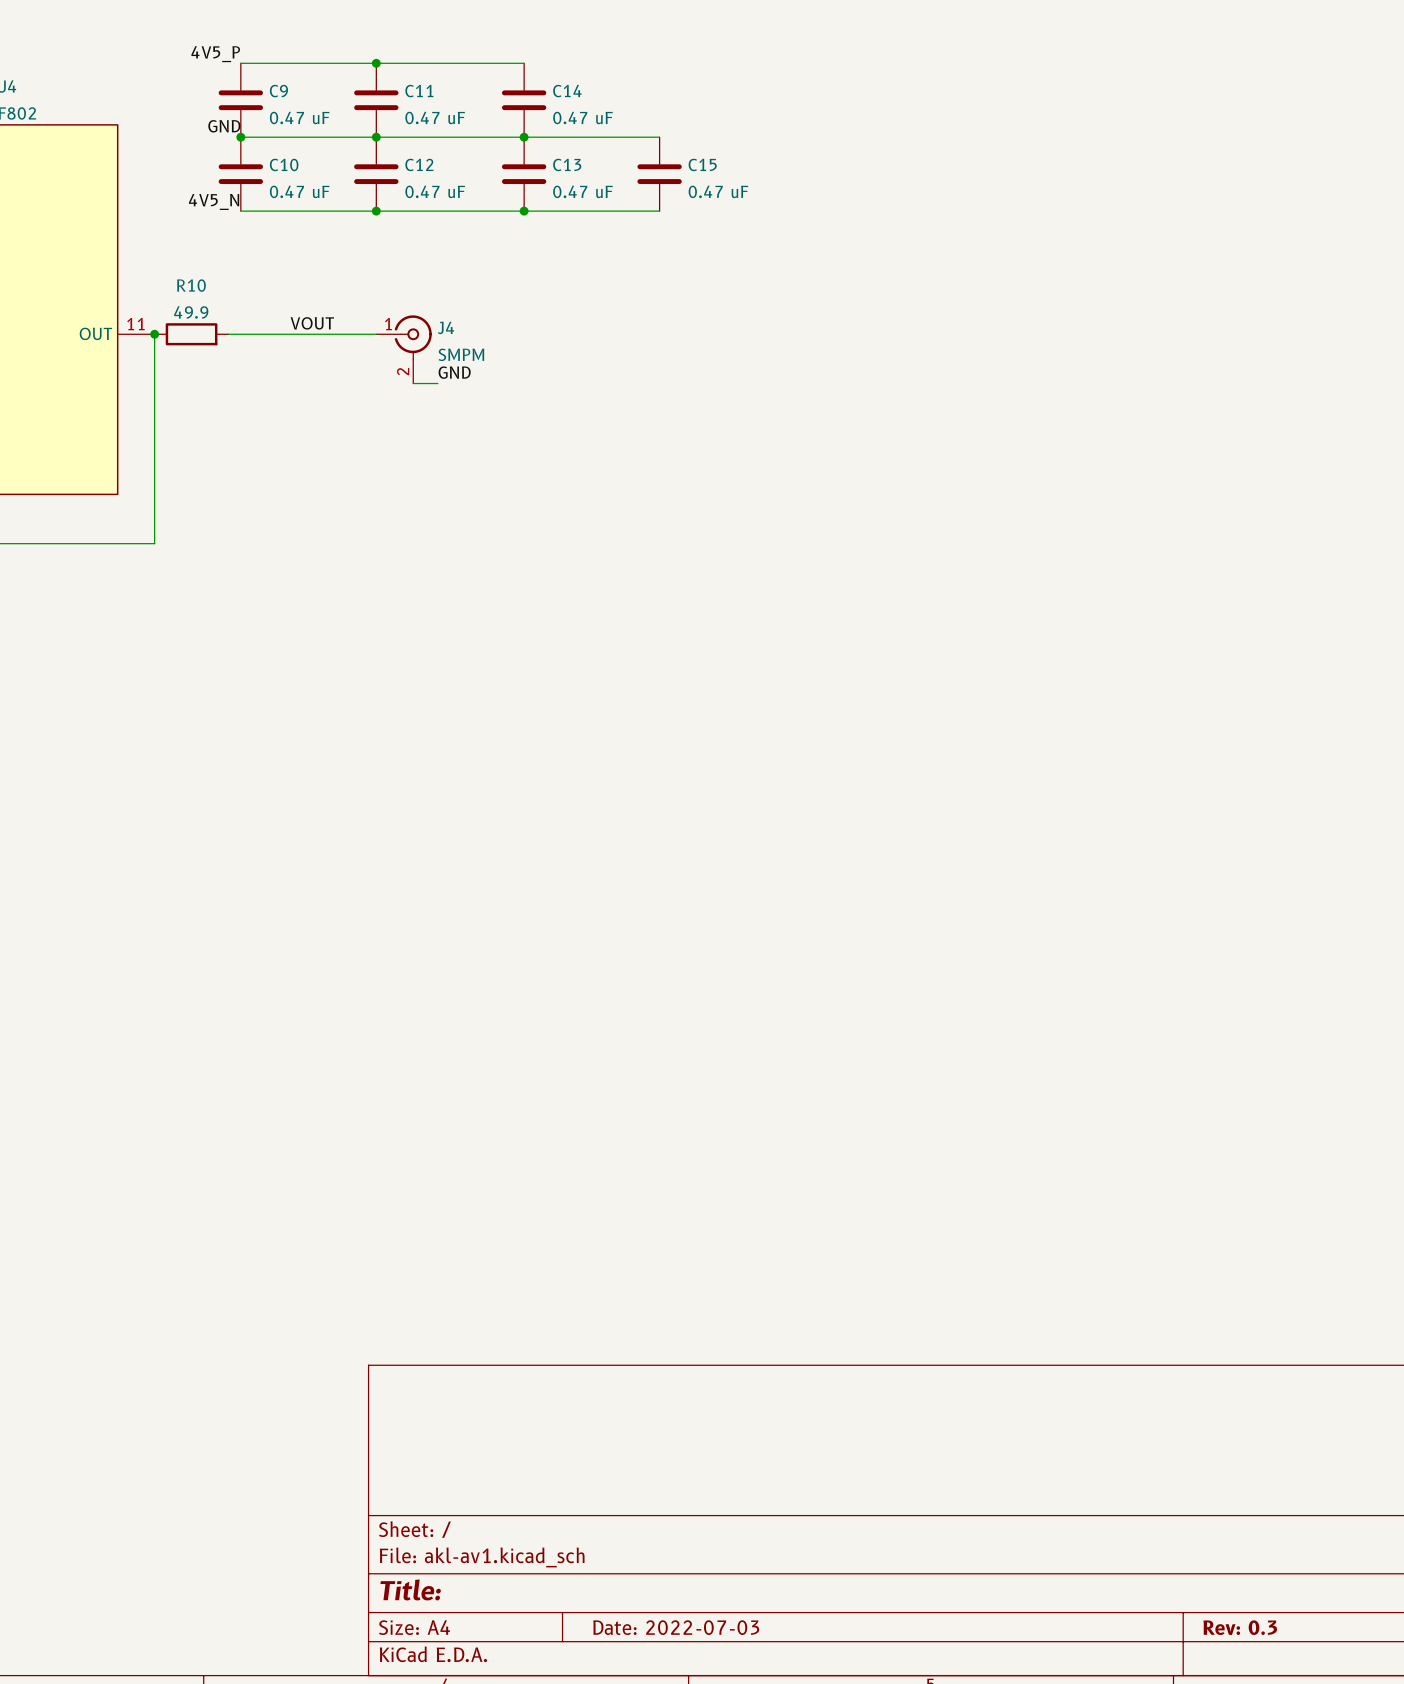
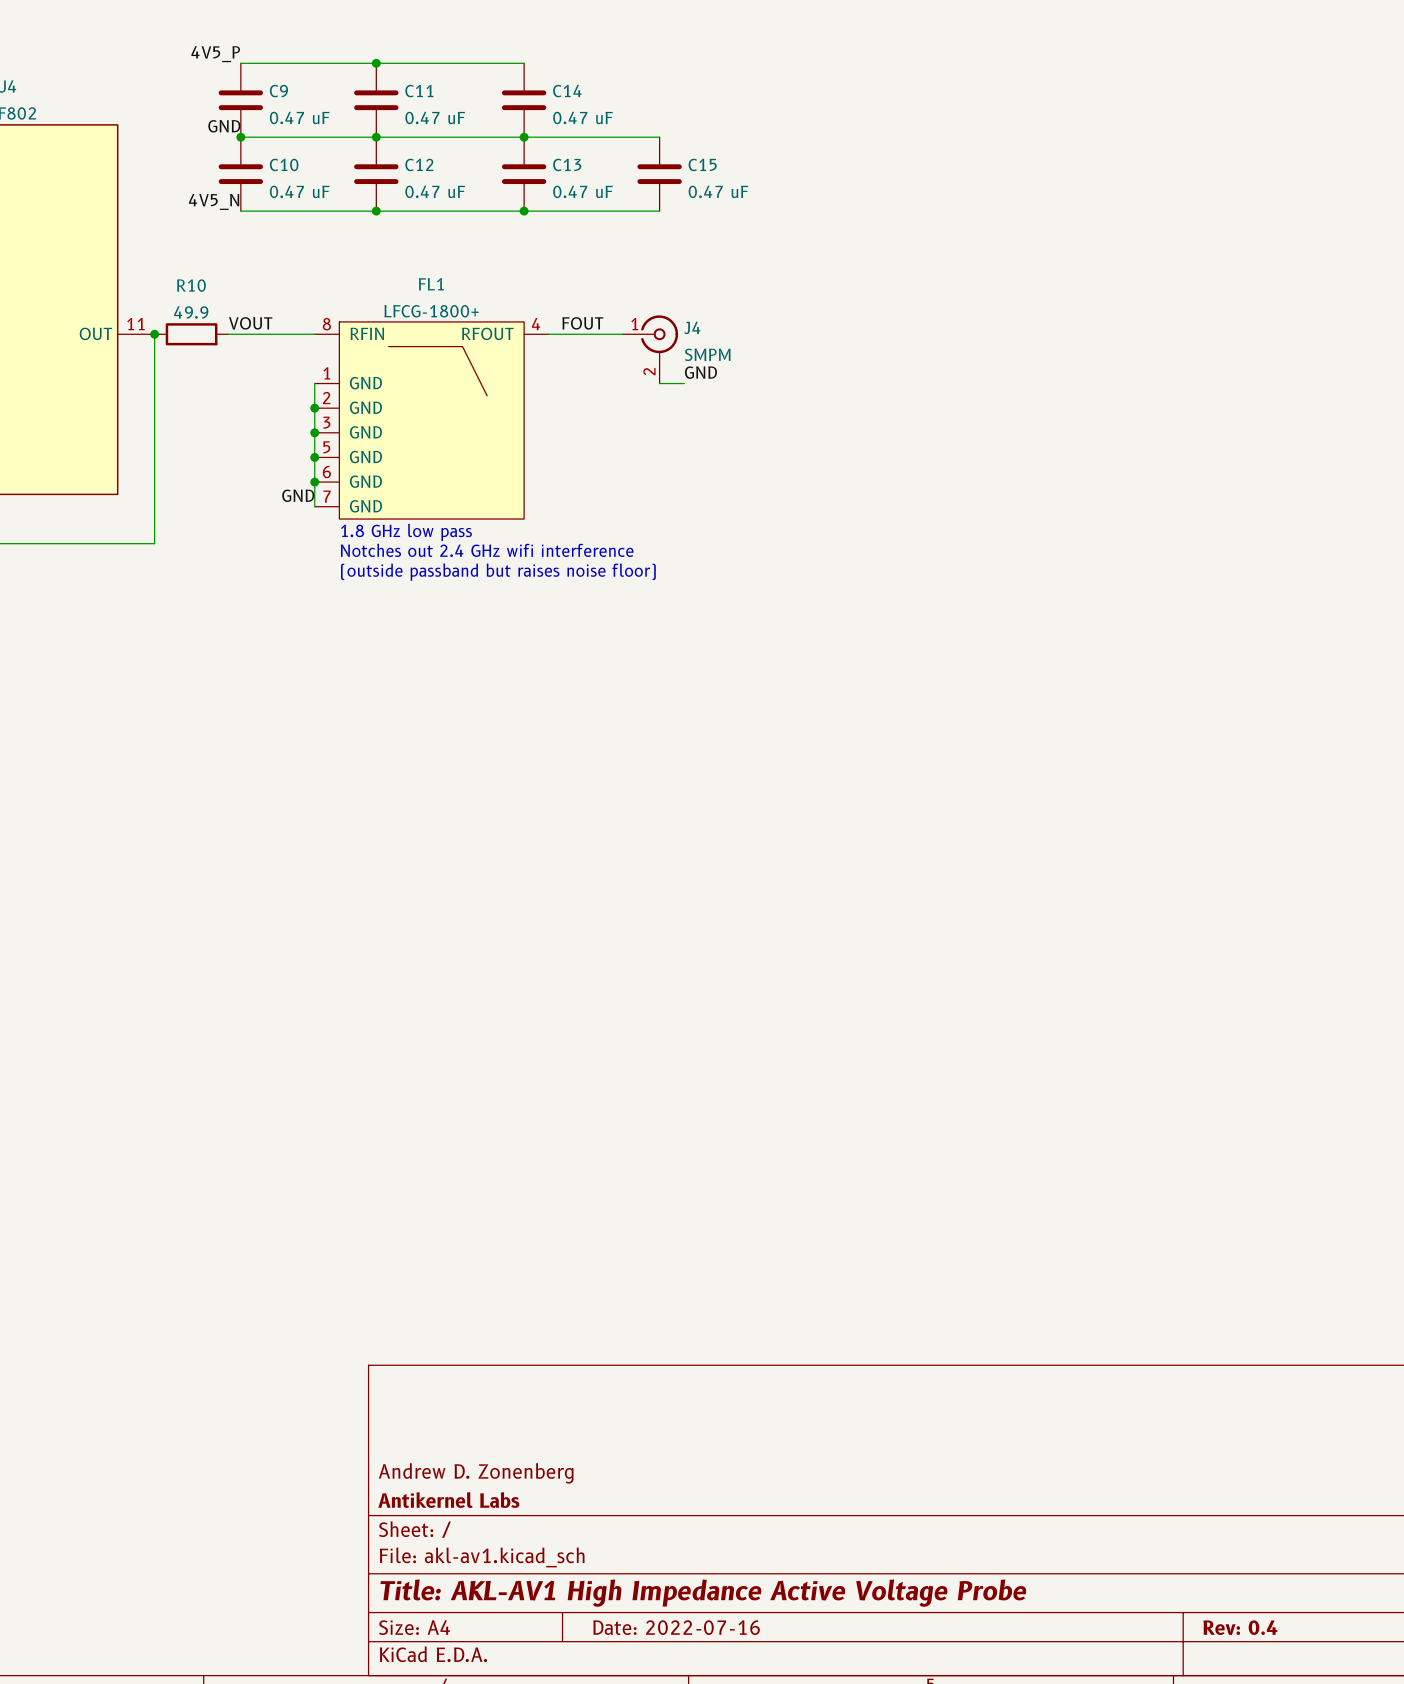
label position: VOUT (312, 323) -> VOUT (250, 323)
label: none -> FOUT (582, 323)
wire: none -> (548, 334) (622, 334)
J4 position: (404, 349) -> (650, 349)
label: GND (454, 372) -> none
label: none -> GND (700, 372)
wire: none -> (314, 383) (314, 506)
wire: none -> (659, 383) (684, 383)
junction: none -> (314, 408)
FL1: none -> LFCG-1800+ (431, 420)
junction: none -> (314, 432)
junction: none -> (314, 457)
junction: none -> (314, 482)
label: none -> GND (298, 495)
text: none -> 1.8 GHz low pass (406, 532)
text: none -> Notches out 2.4 GHz wifi interference (487, 550)
text: none -> (outside passband but raises noise floor) (498, 572)
title block: none -> Andrew D. Zonenberg (476, 1473)
title block: none -> Antikernel Labs (448, 1500)
title block: Title: (410, 1589) -> Title: AKL-AV1 High Impedance Active Voltage Probe (703, 1593)
title block: Date: 2022-07-03 (676, 1627) -> Date: 2022-07-16 (676, 1627)
title block: Rev: 0.3 (1240, 1627) -> Rev: 0.4 (1240, 1627)

